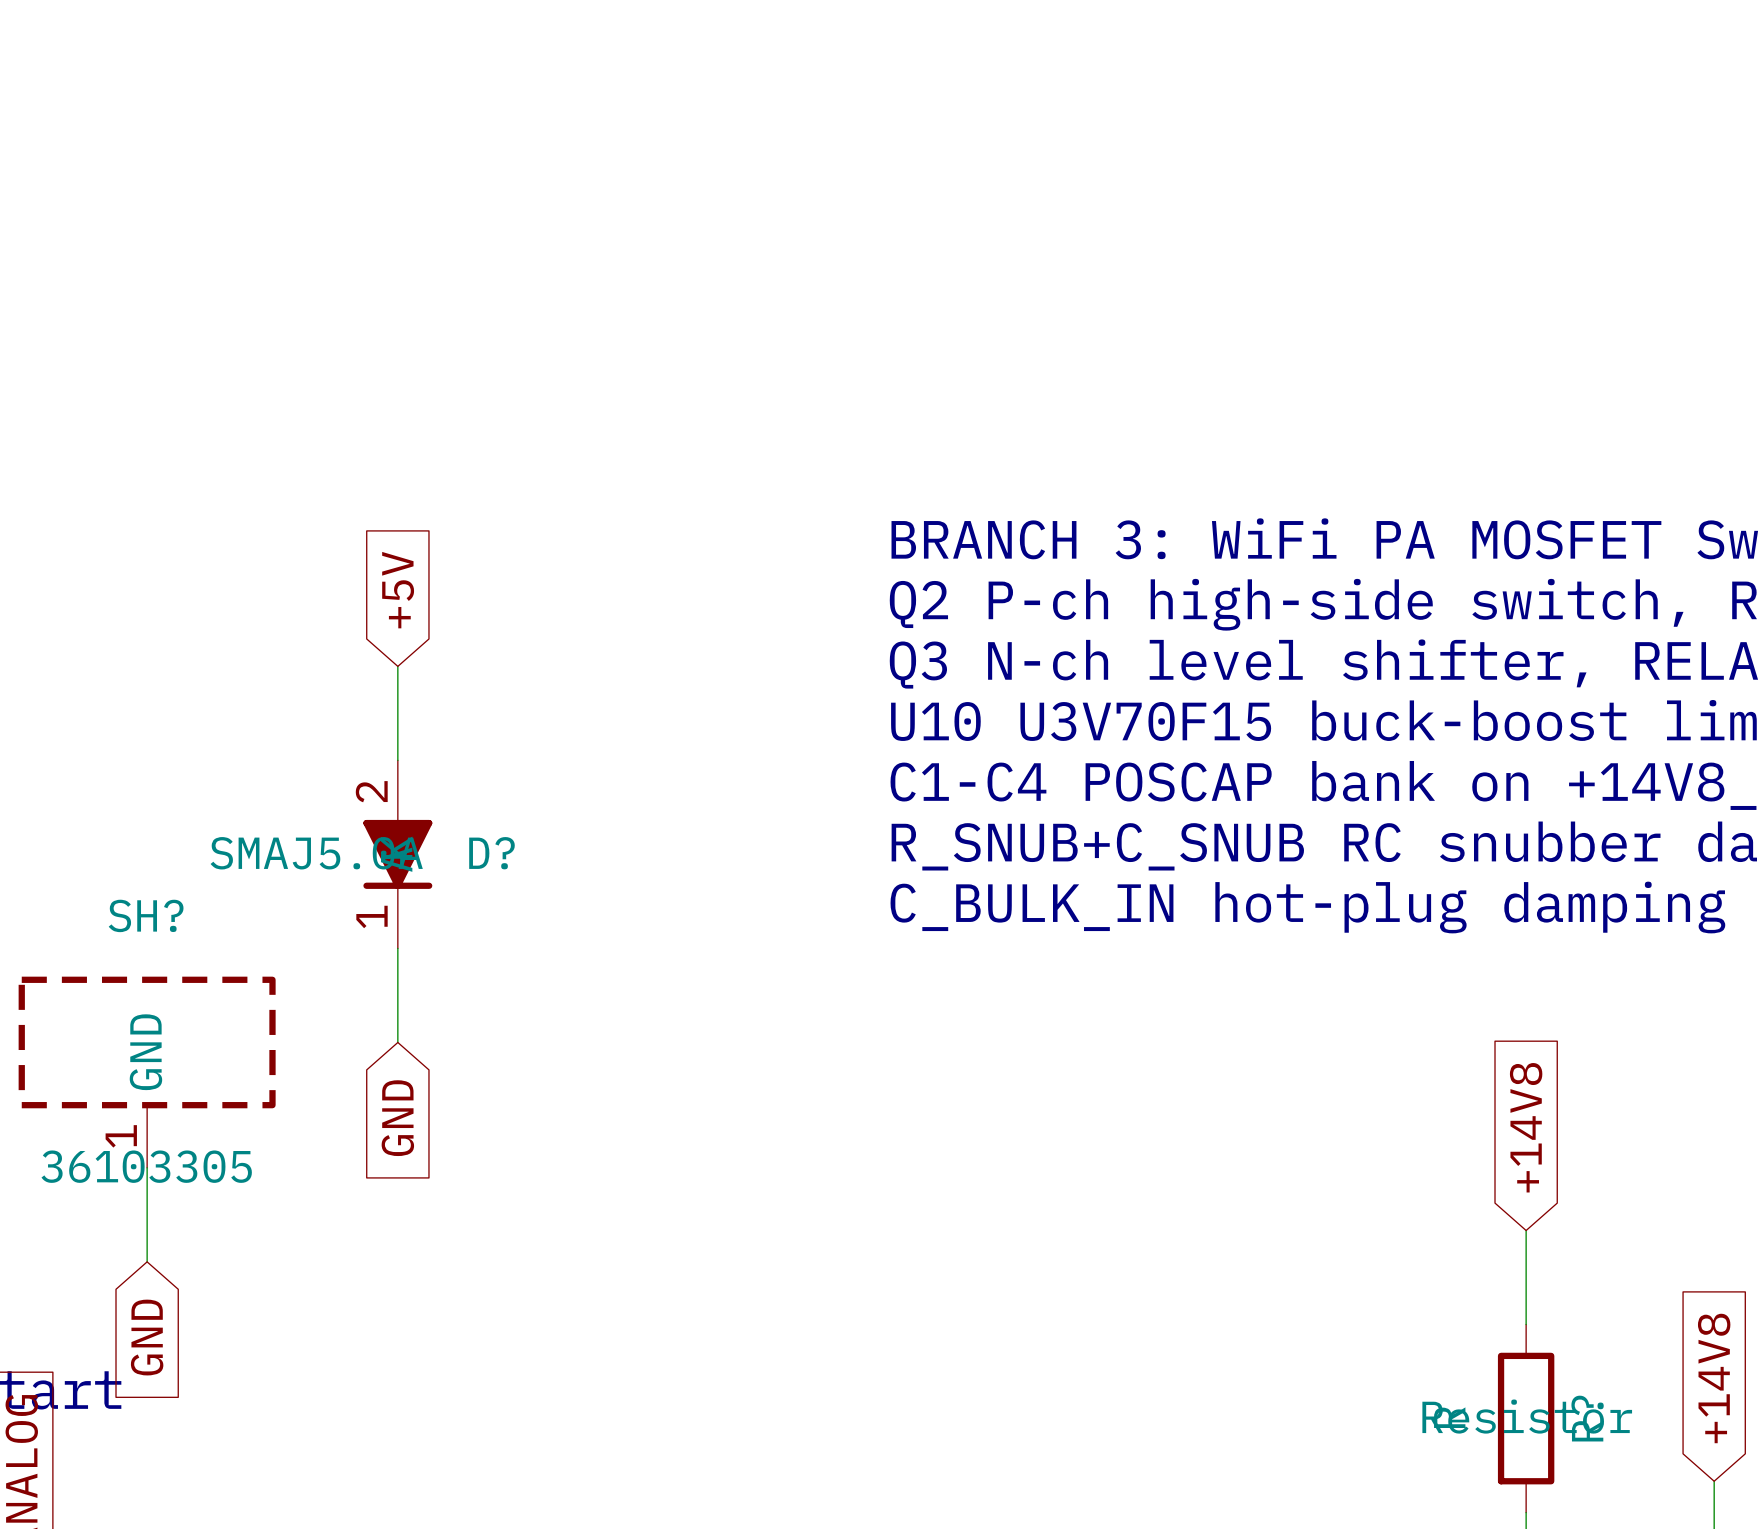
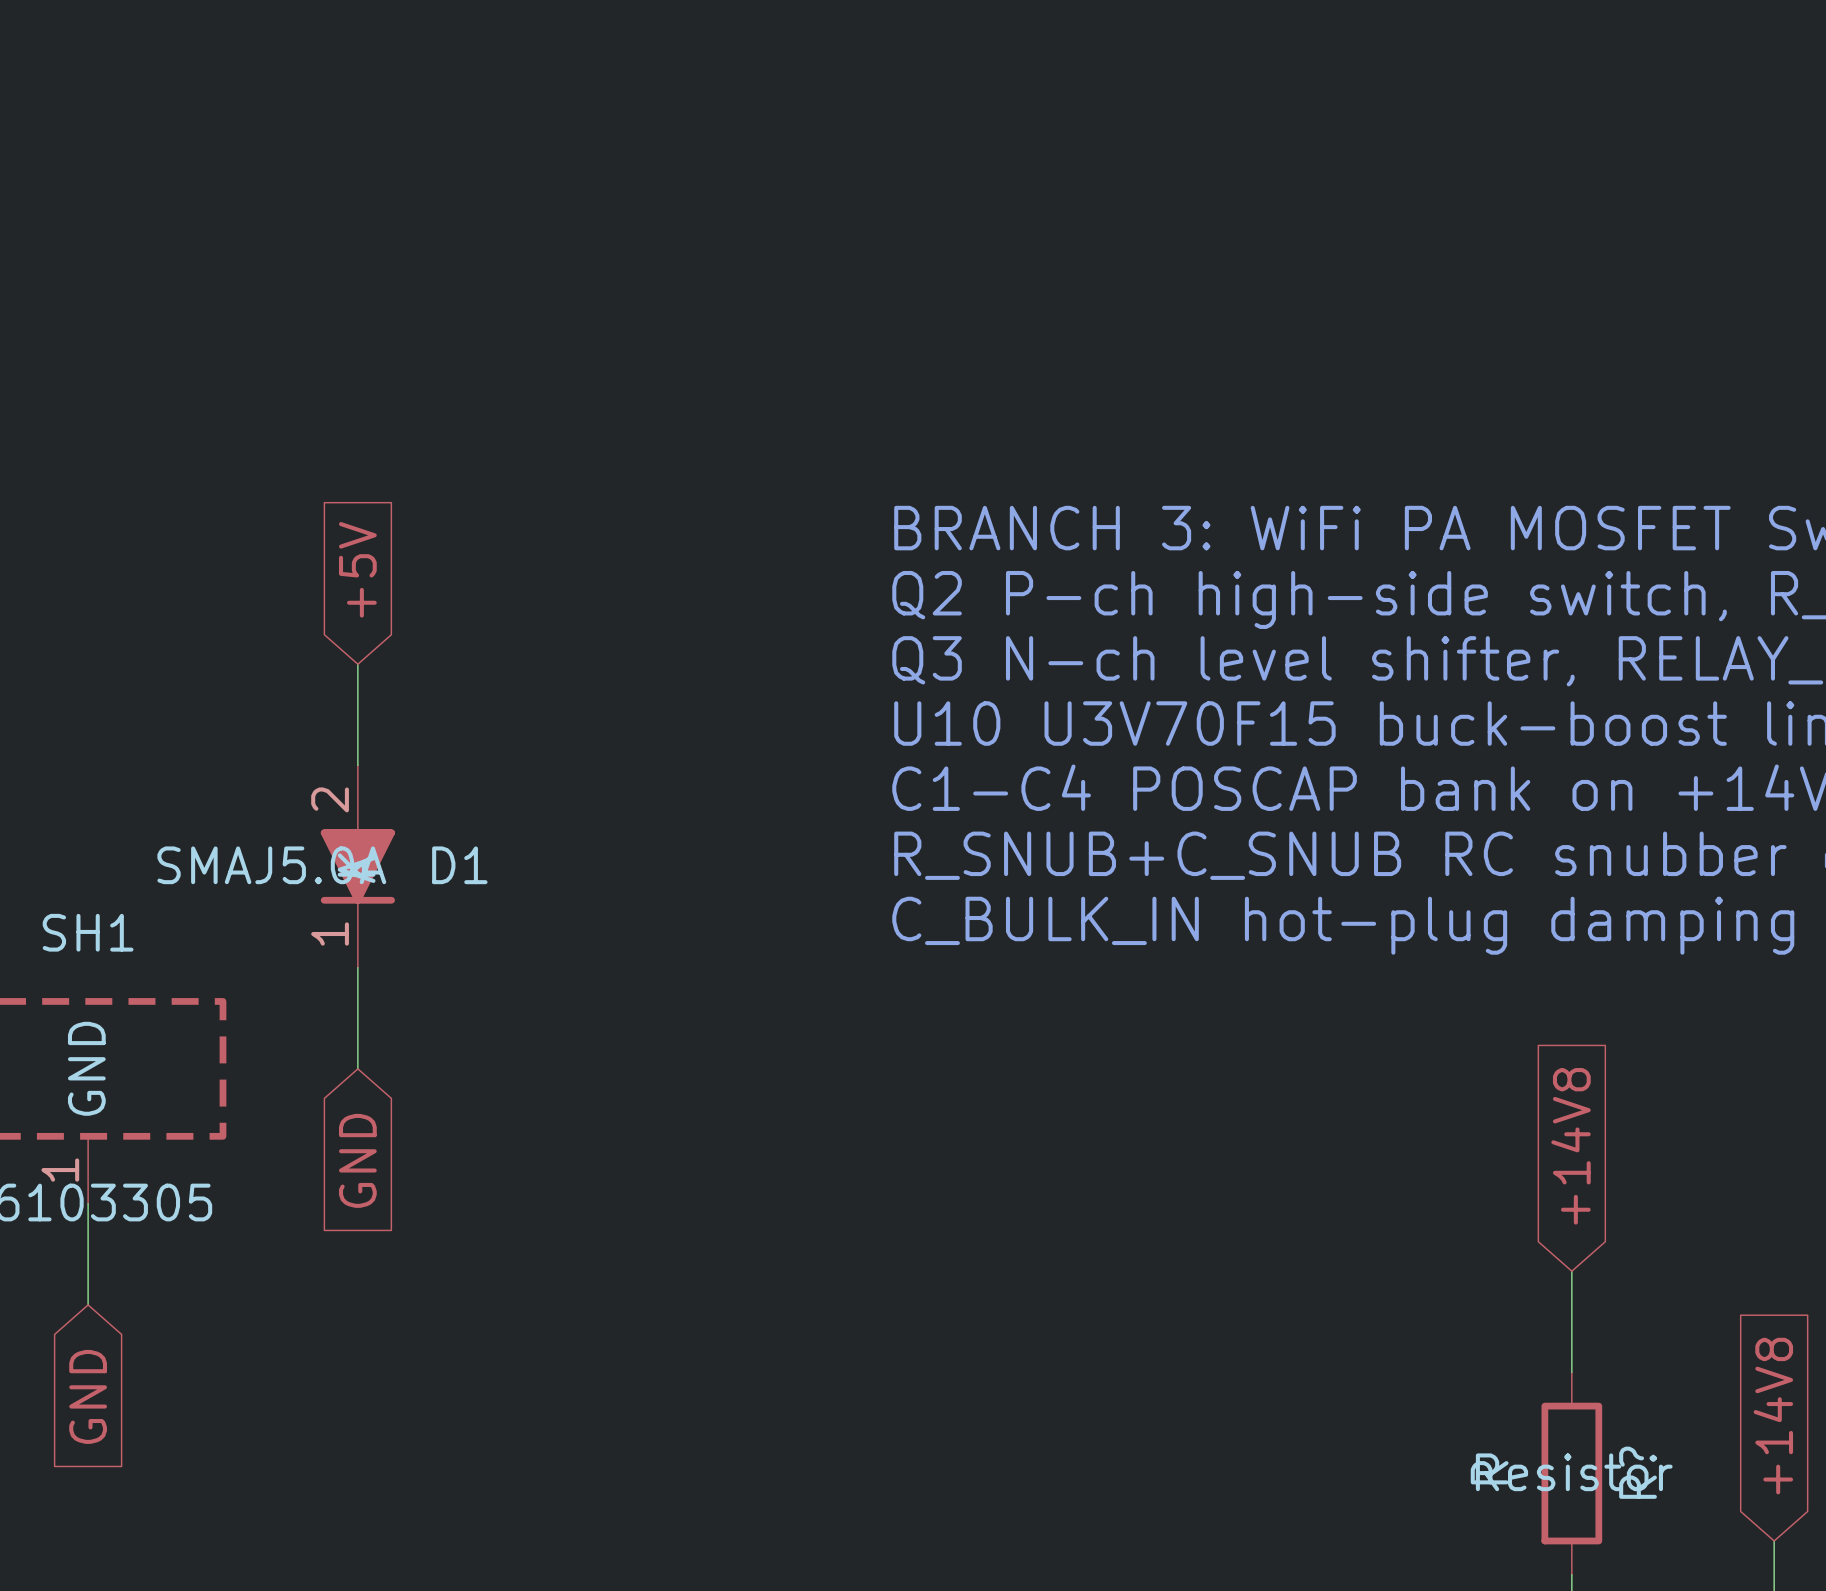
D? name: D? (491, 853) -> D1 (459, 865)
SH? name: SH? (146, 915) -> SH1 (88, 932)

